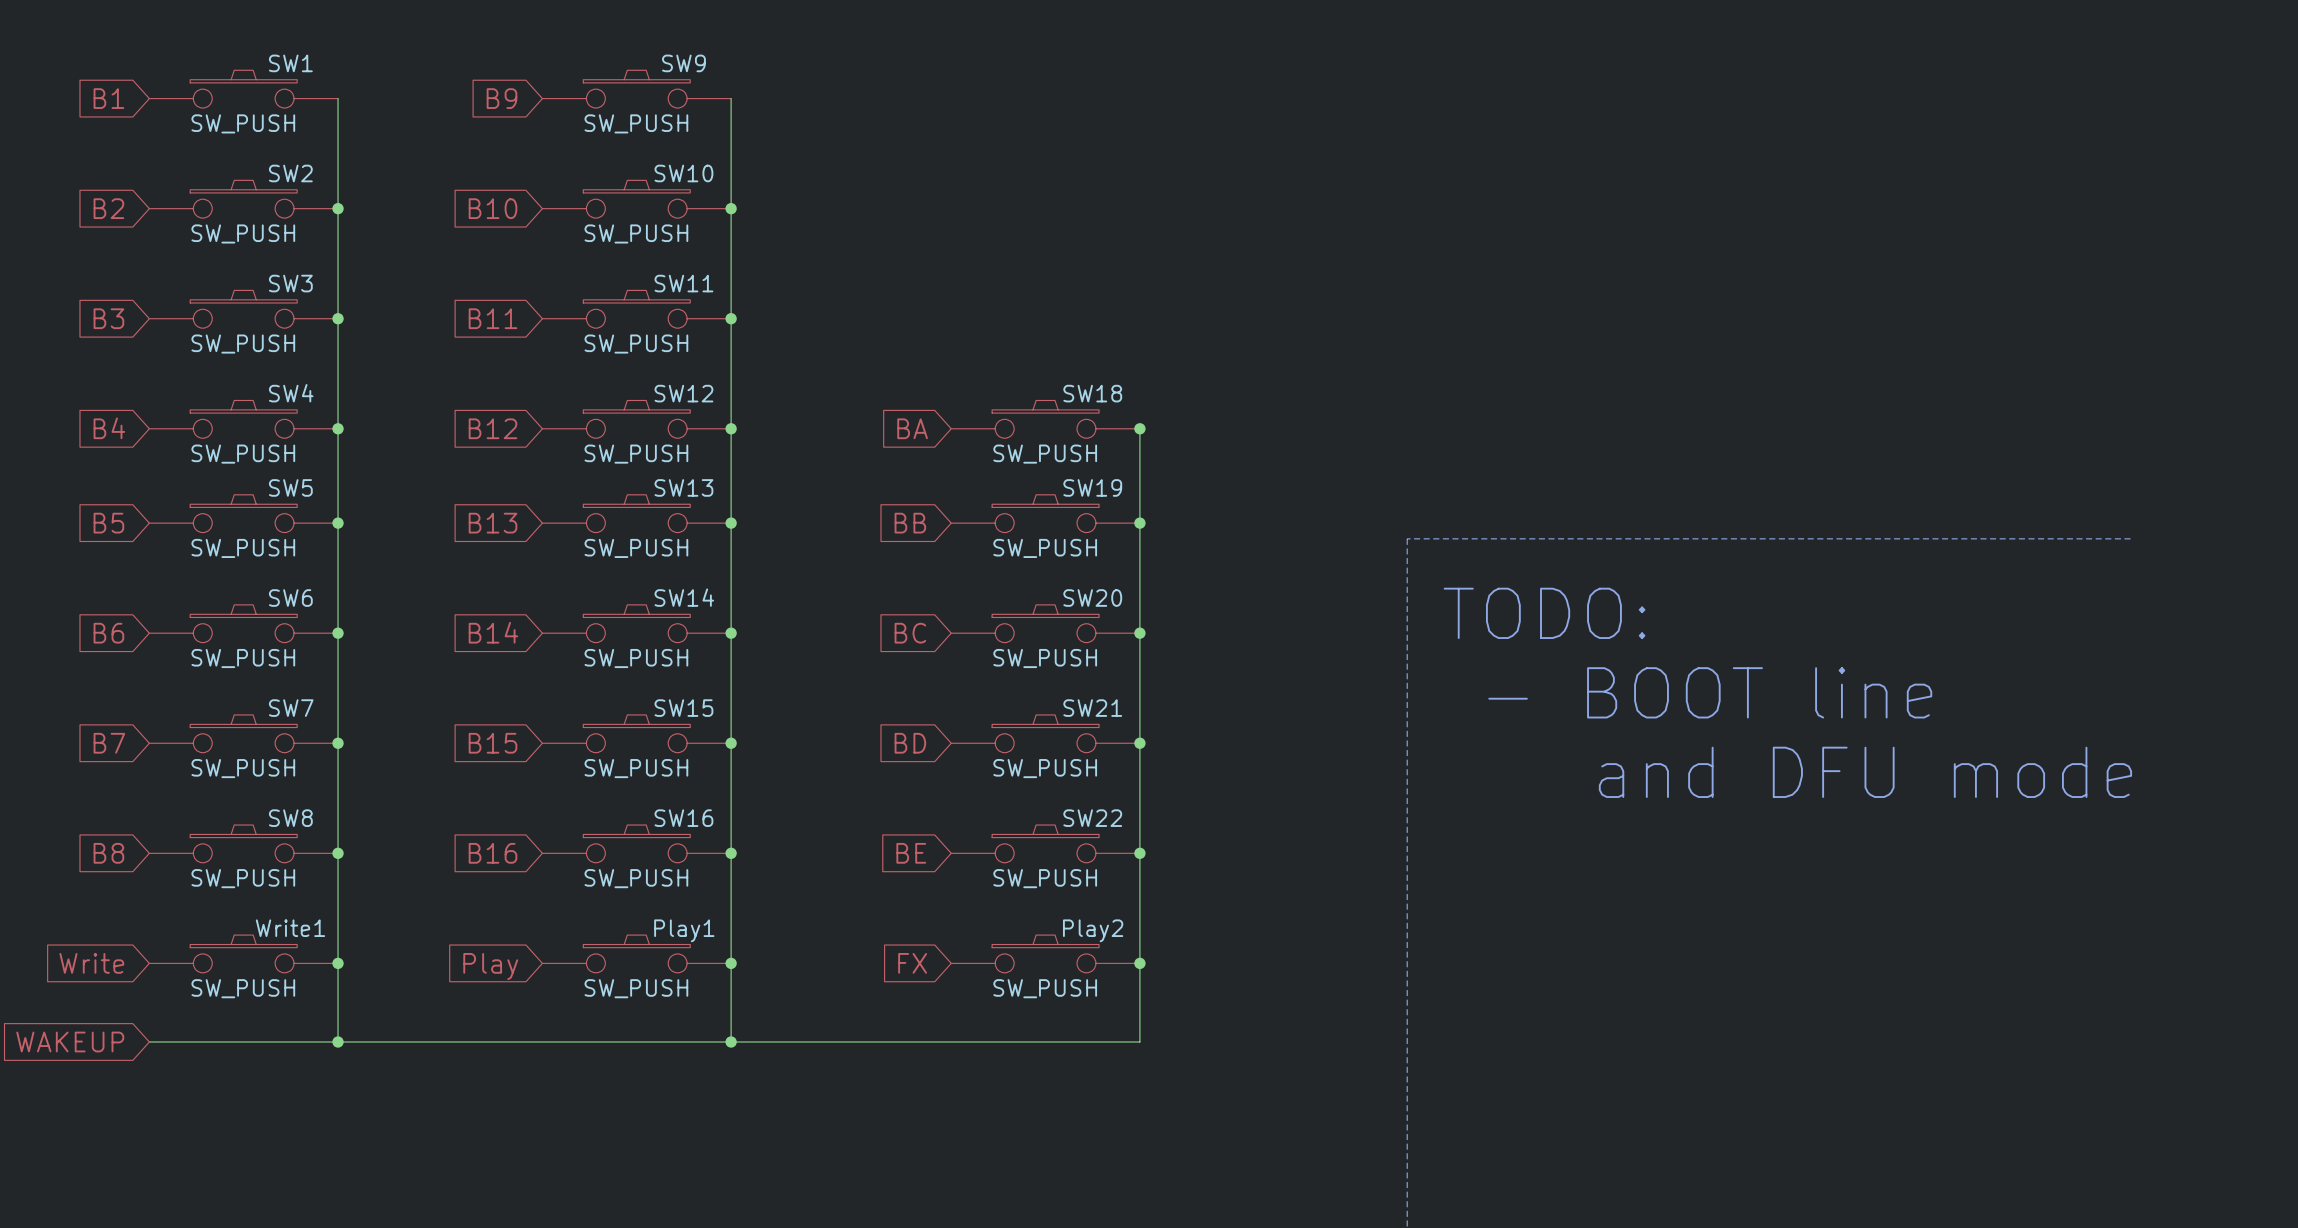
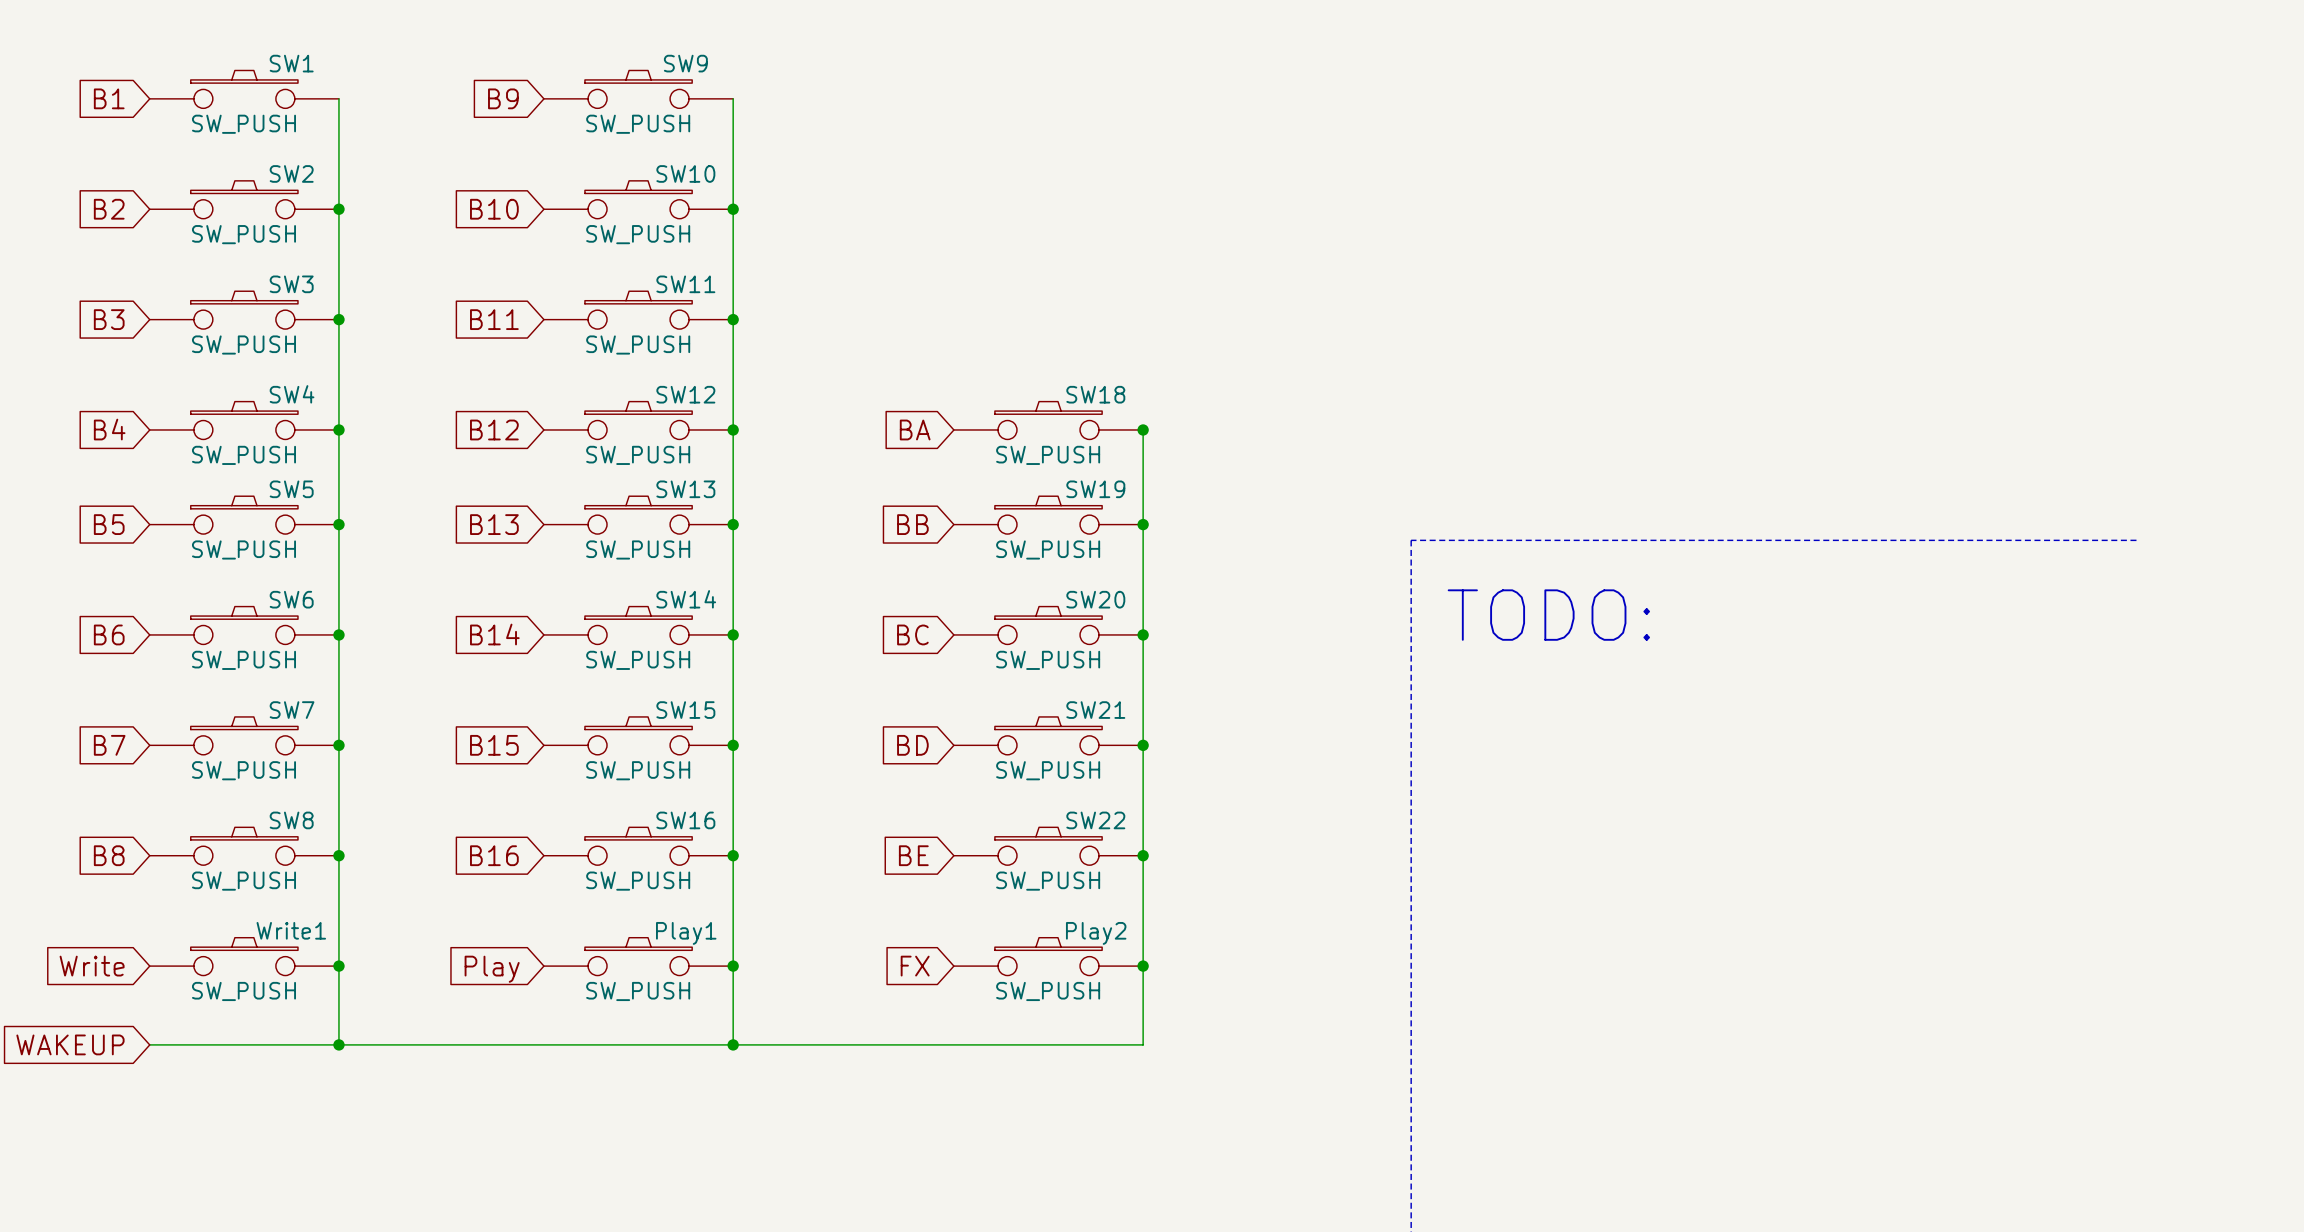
text: - BOOT line (1710, 692) -> none
text: and DFU mode (1865, 772) -> none

